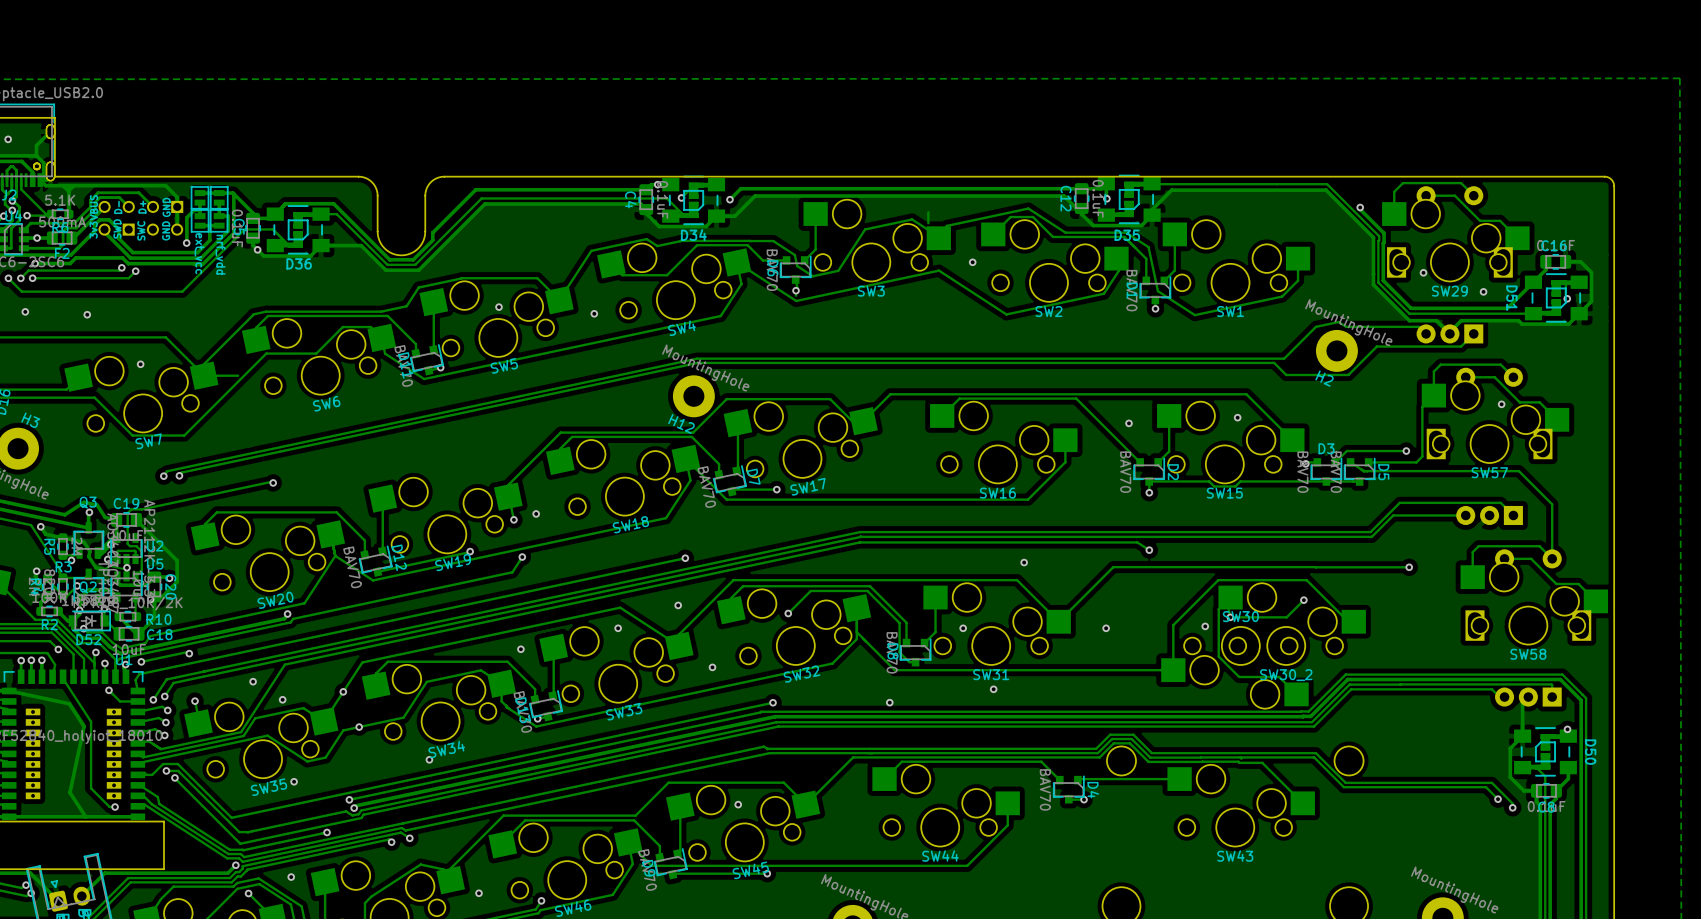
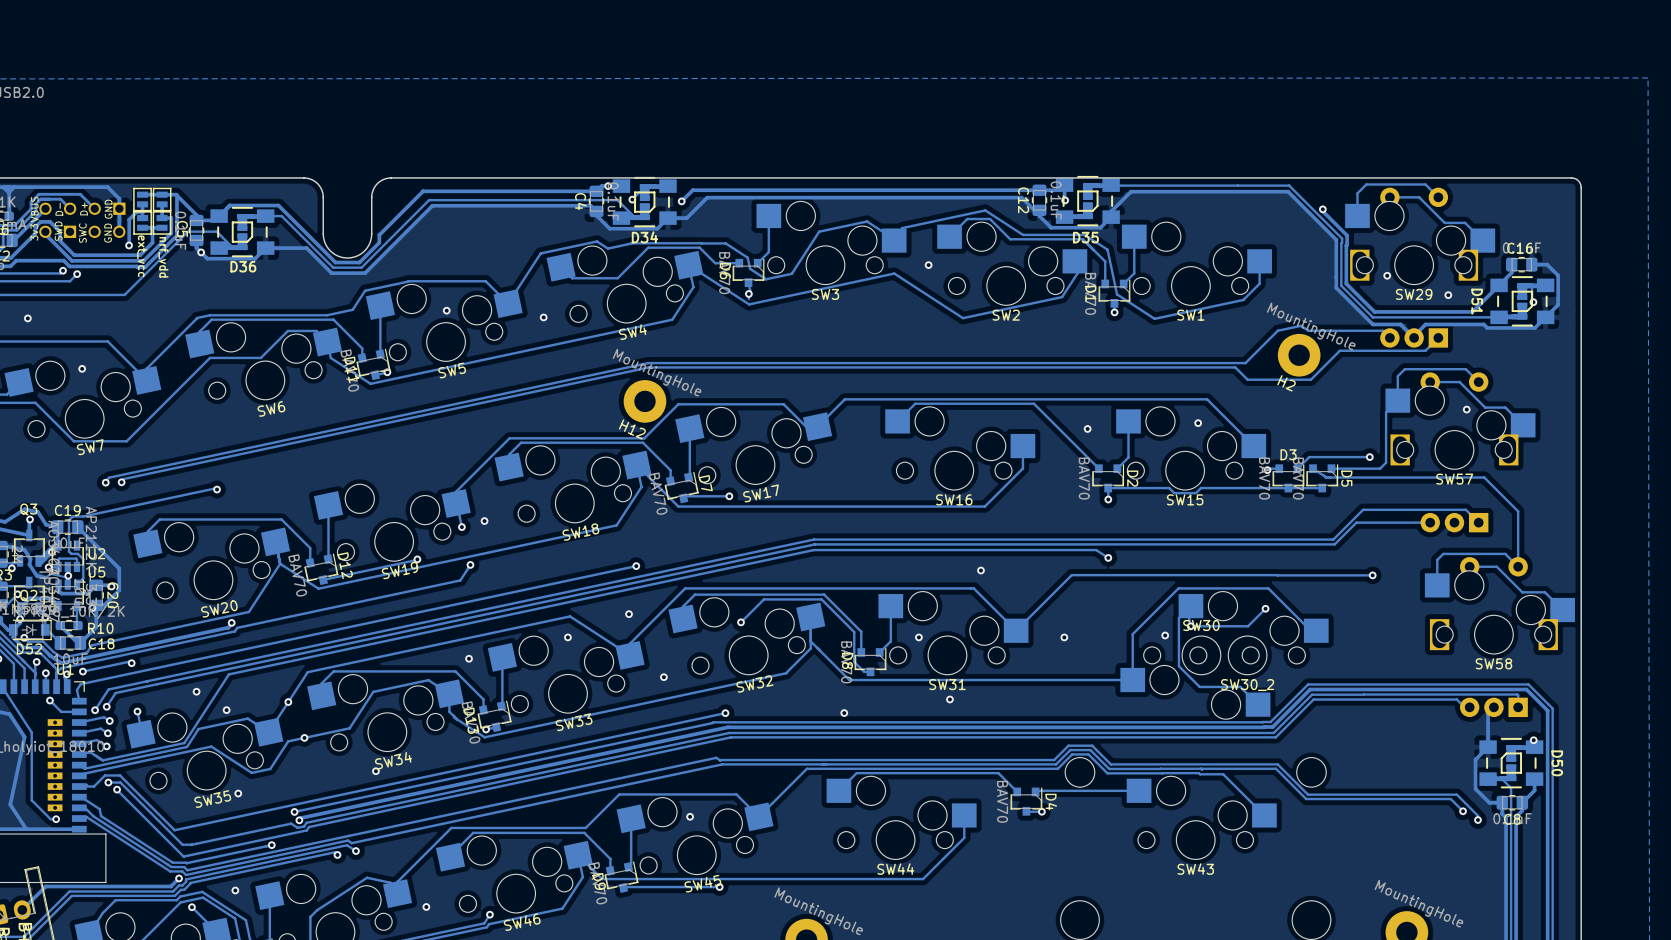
track: (928, 212) (928, 223) -> none
track: (238, 375) (204, 375) -> none

